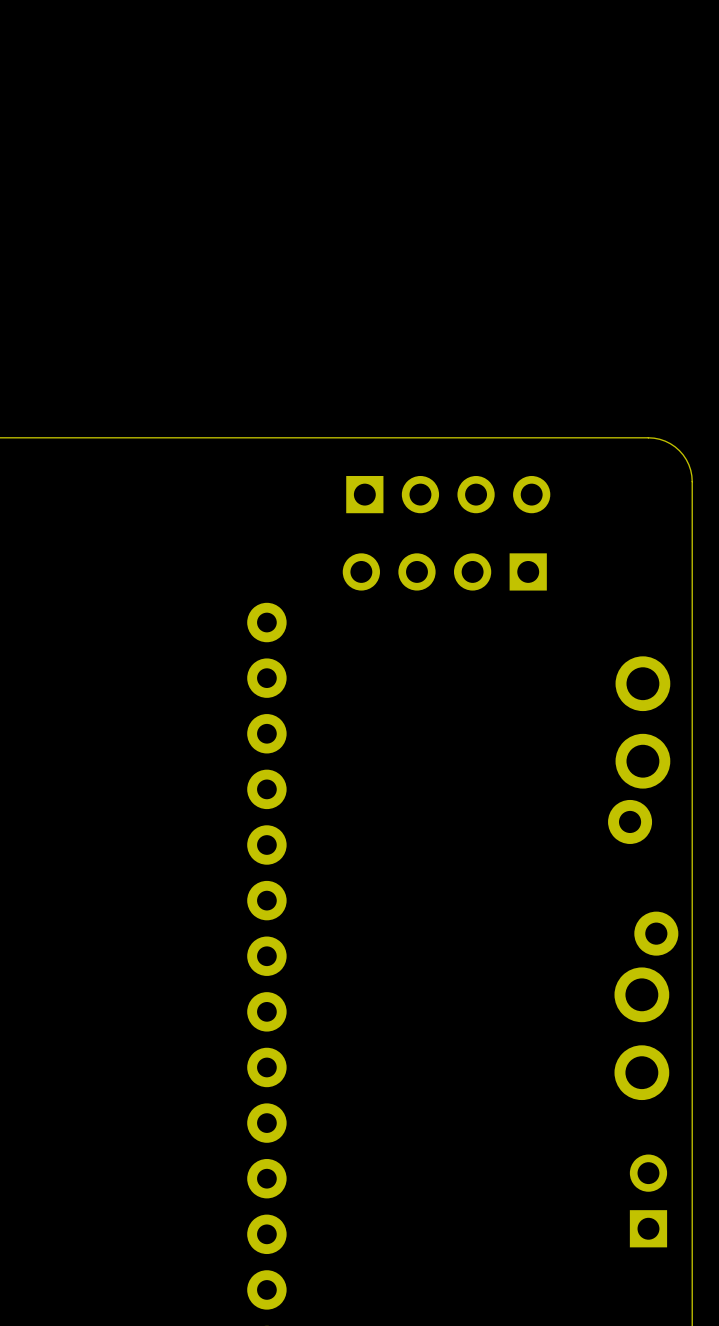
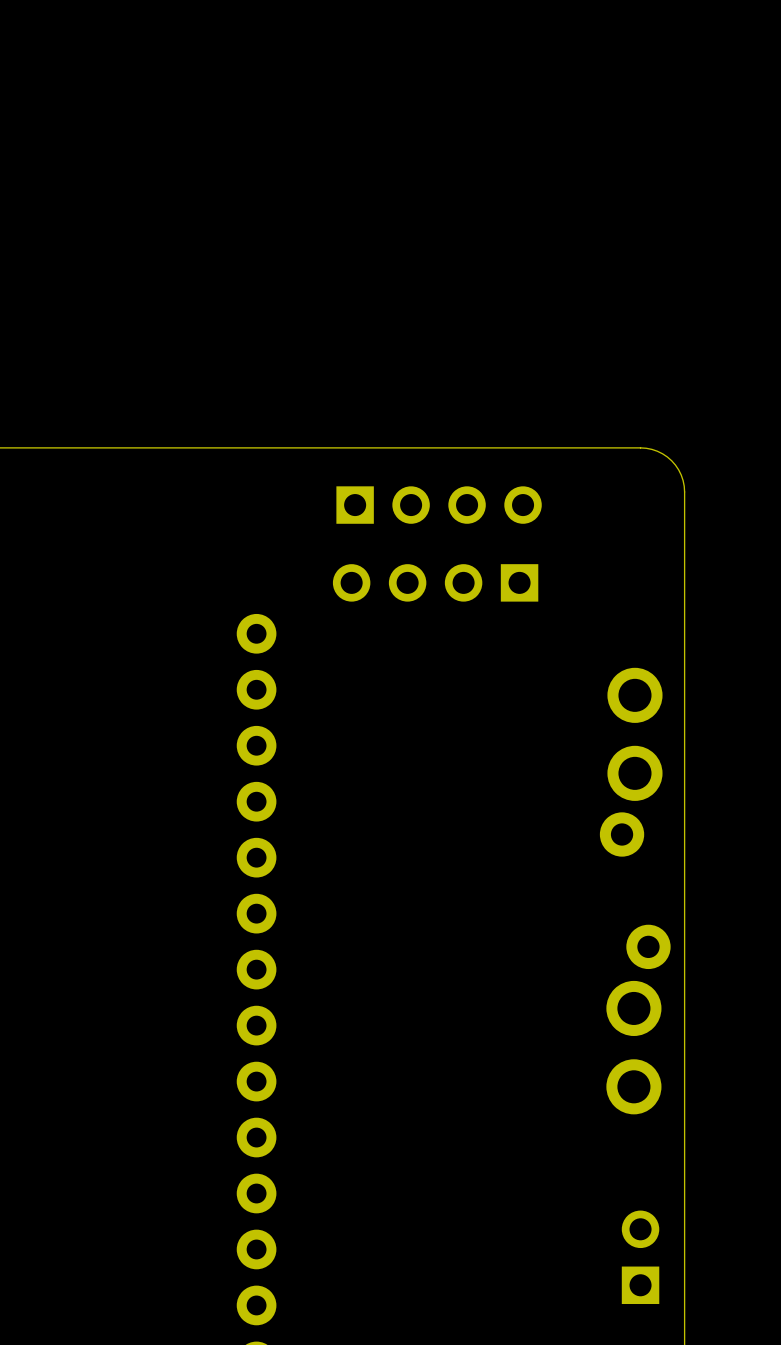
part position: (648, 1200) -> (640, 1257)

